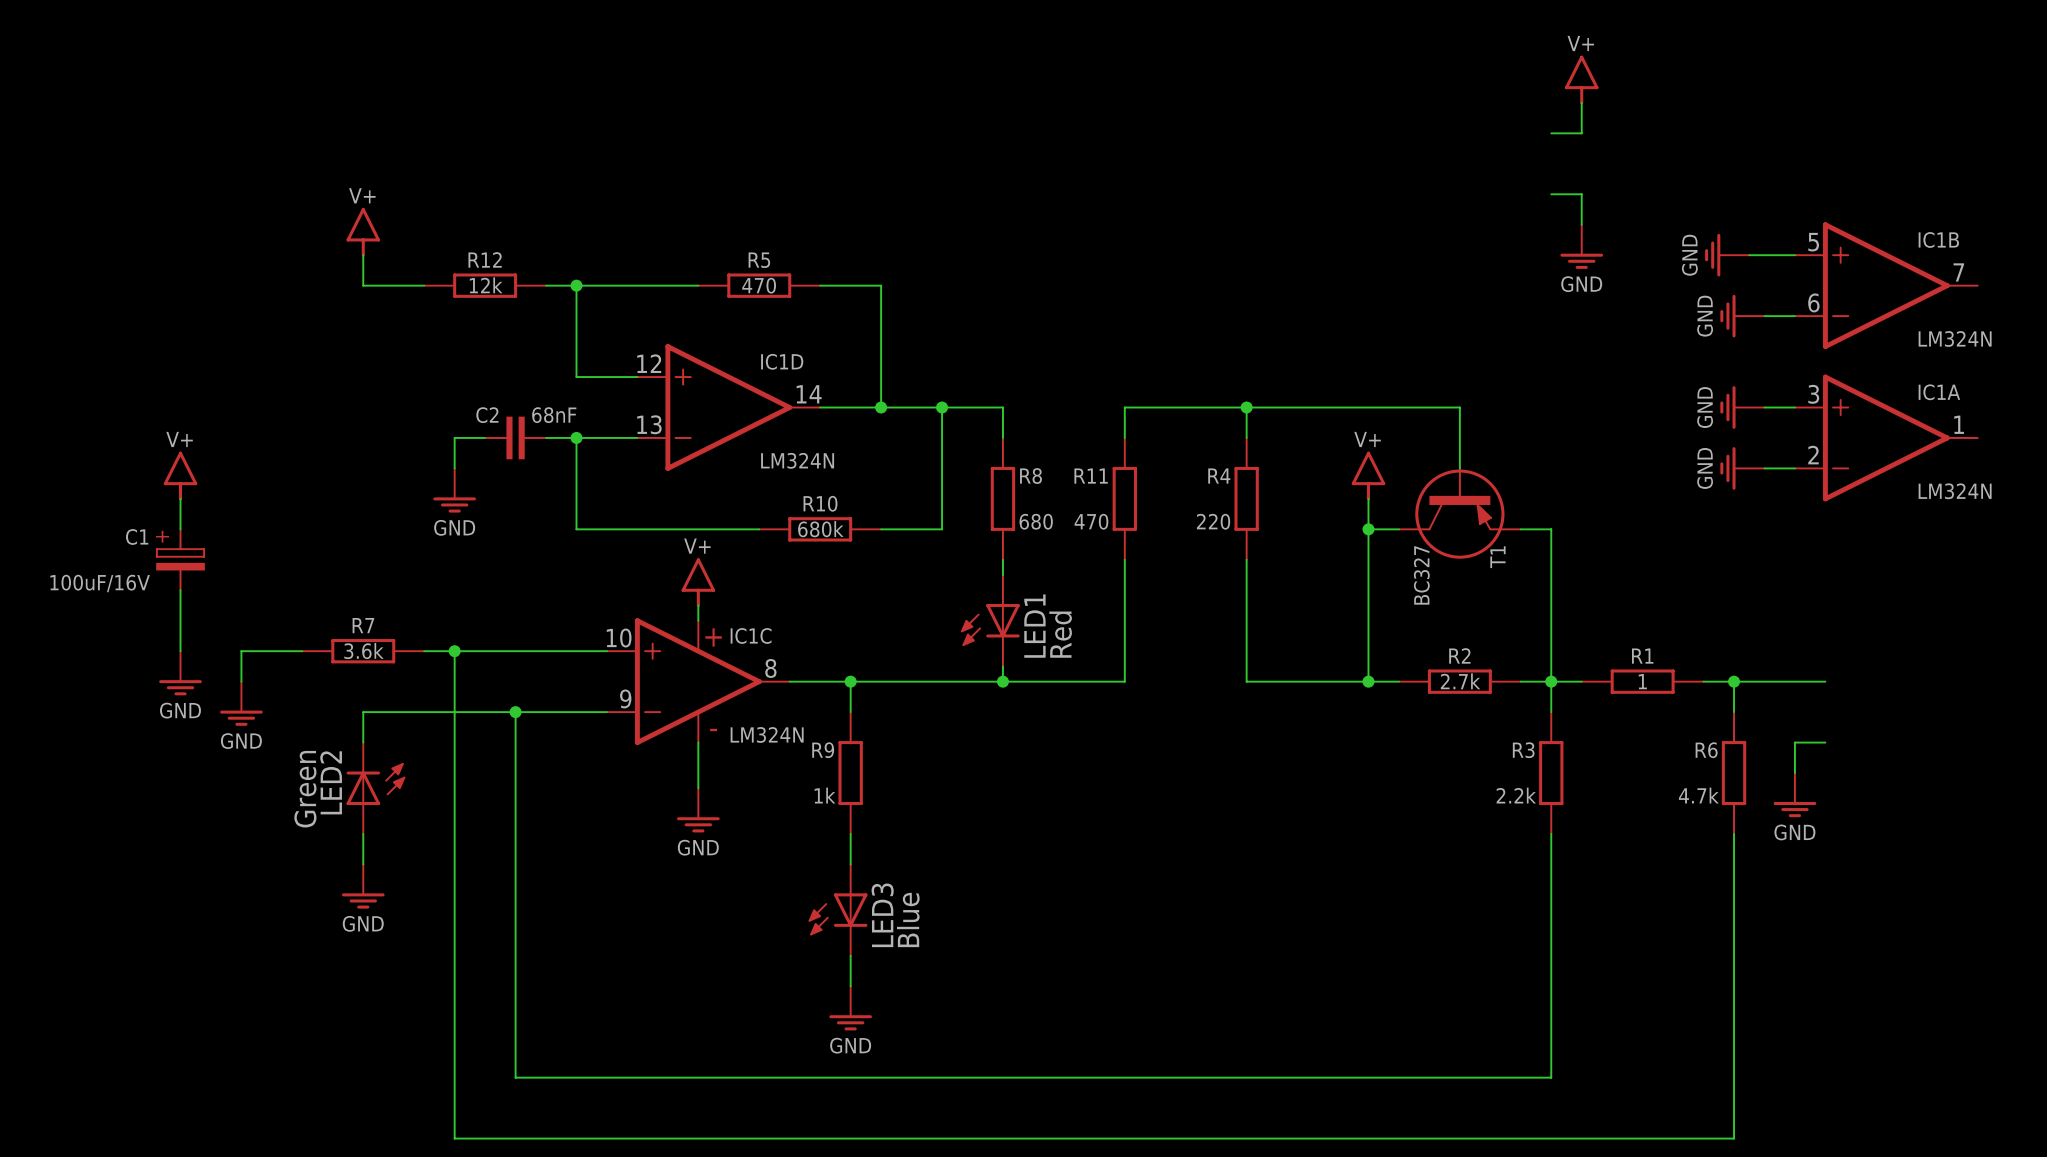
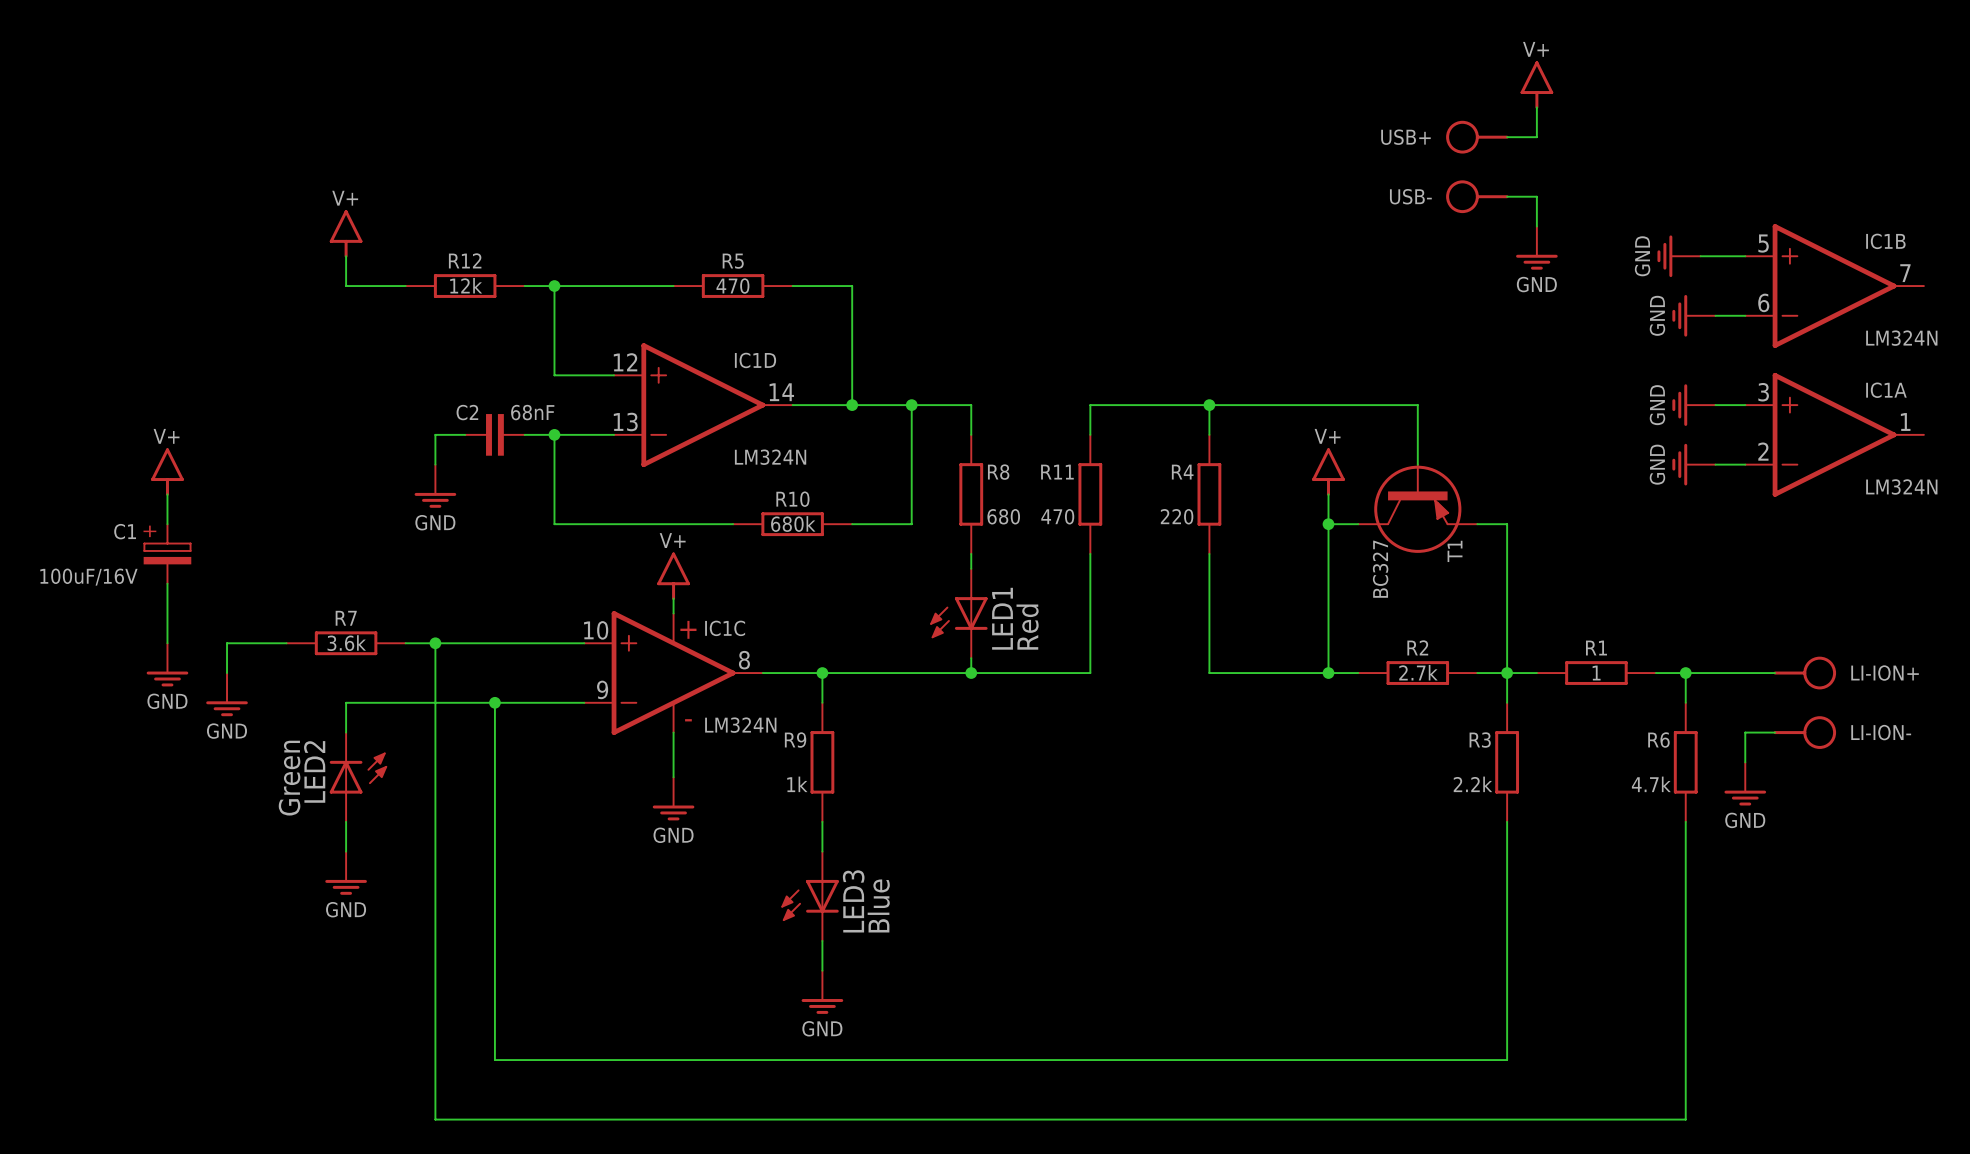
USB+: none -> (1477, 137)
USB-: none -> (1477, 196)
LI-ION+: none -> (1804, 673)
LI-ION-: none -> (1804, 732)

